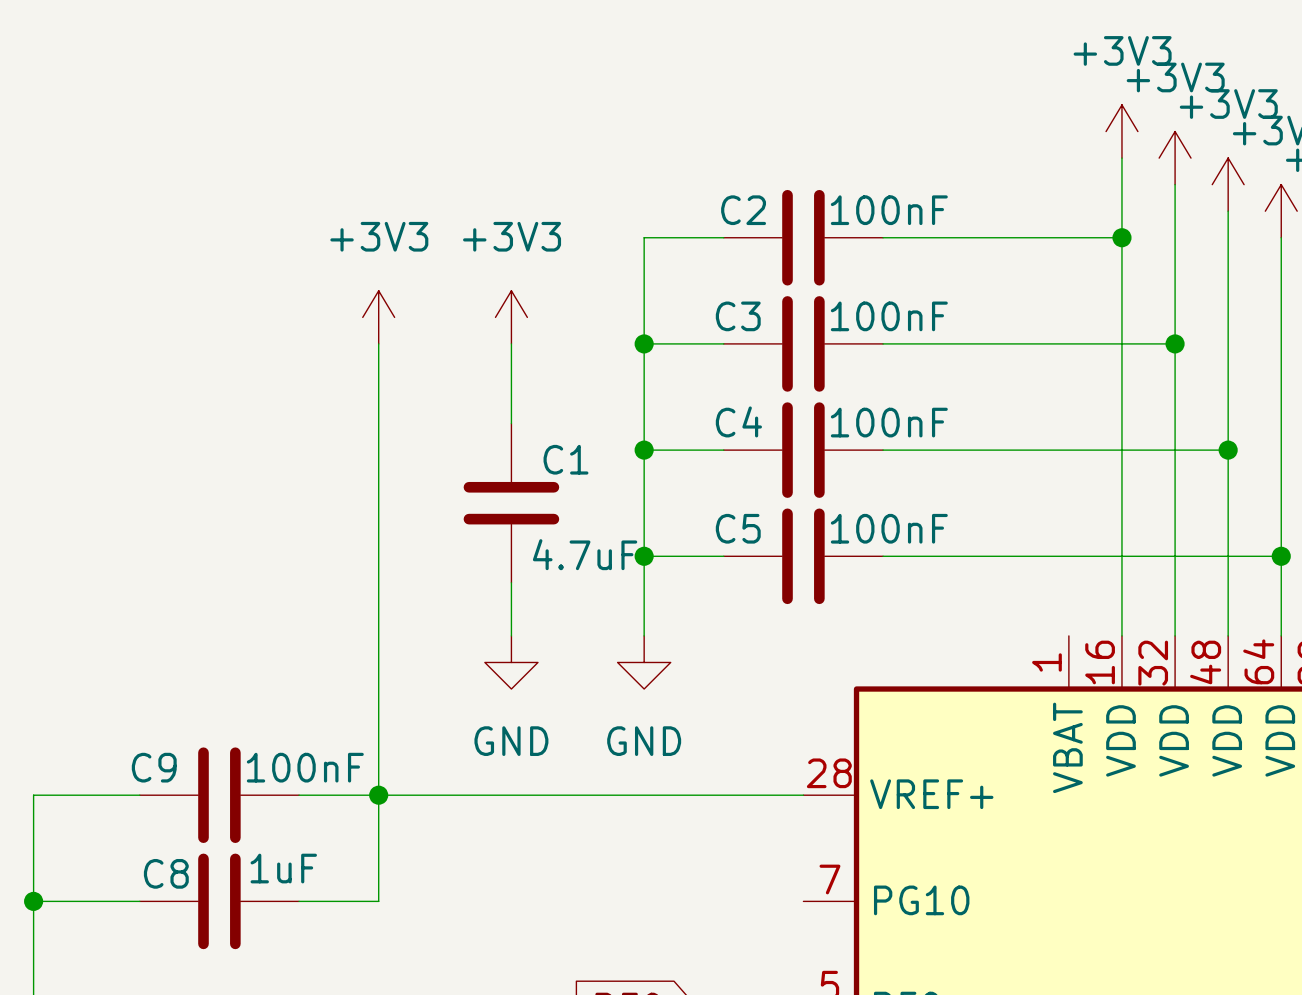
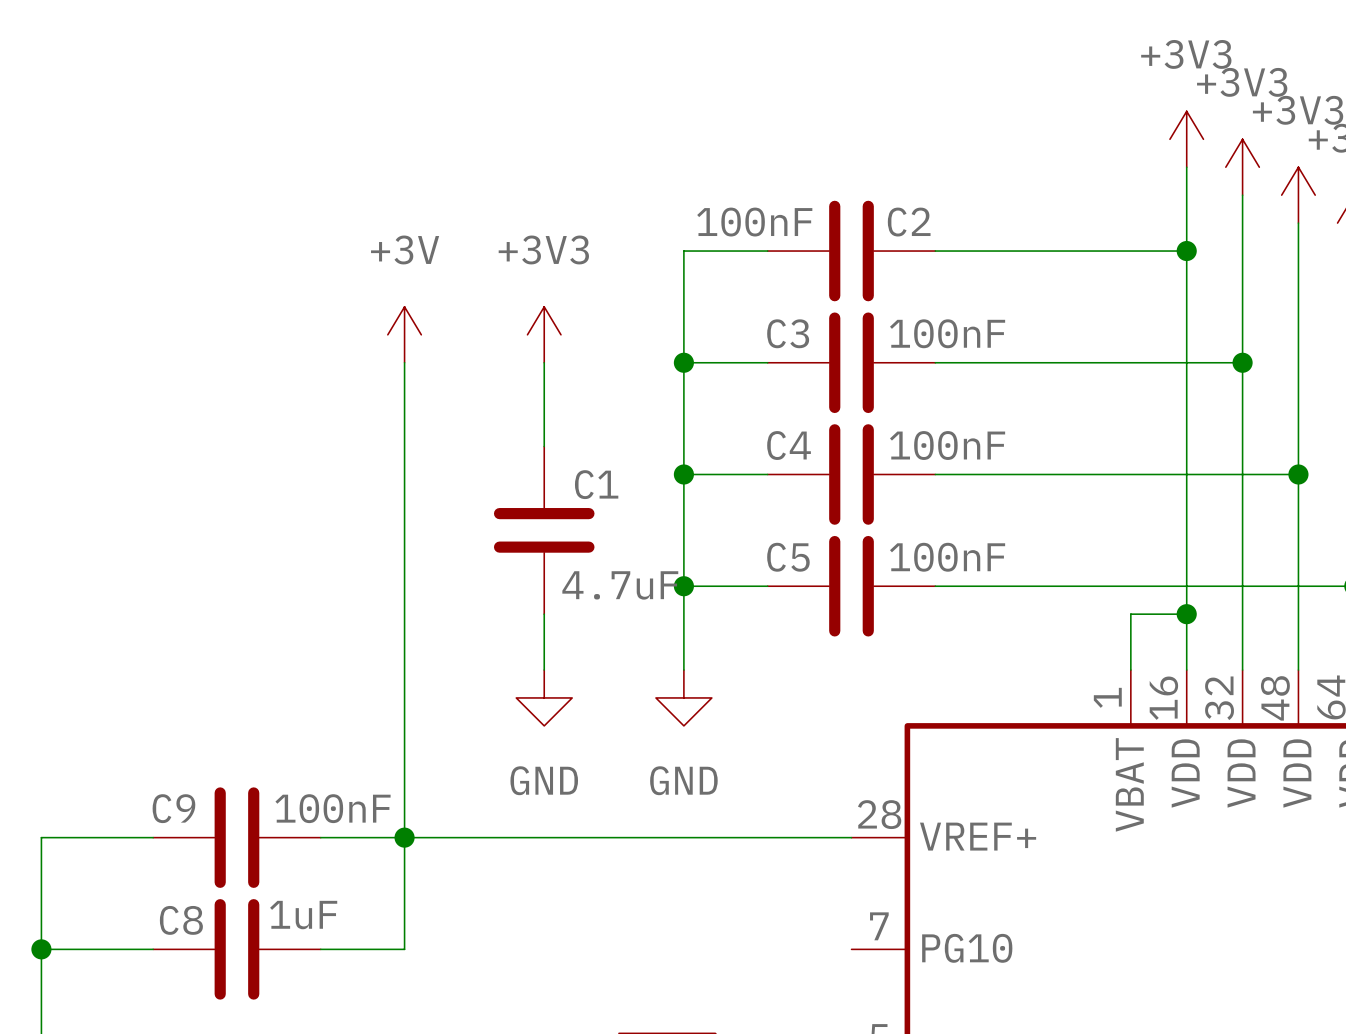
C2 name position: C2 (743, 210) -> C2 (909, 222)
C2 value position: 100nF (889, 210) -> 100nF (754, 222)
power symbol: +3V3 (378, 317) -> +3V (404, 334)
wire: none -> (1186, 614) (1130, 614) (1130, 670)
junction: none -> (1186, 614)

